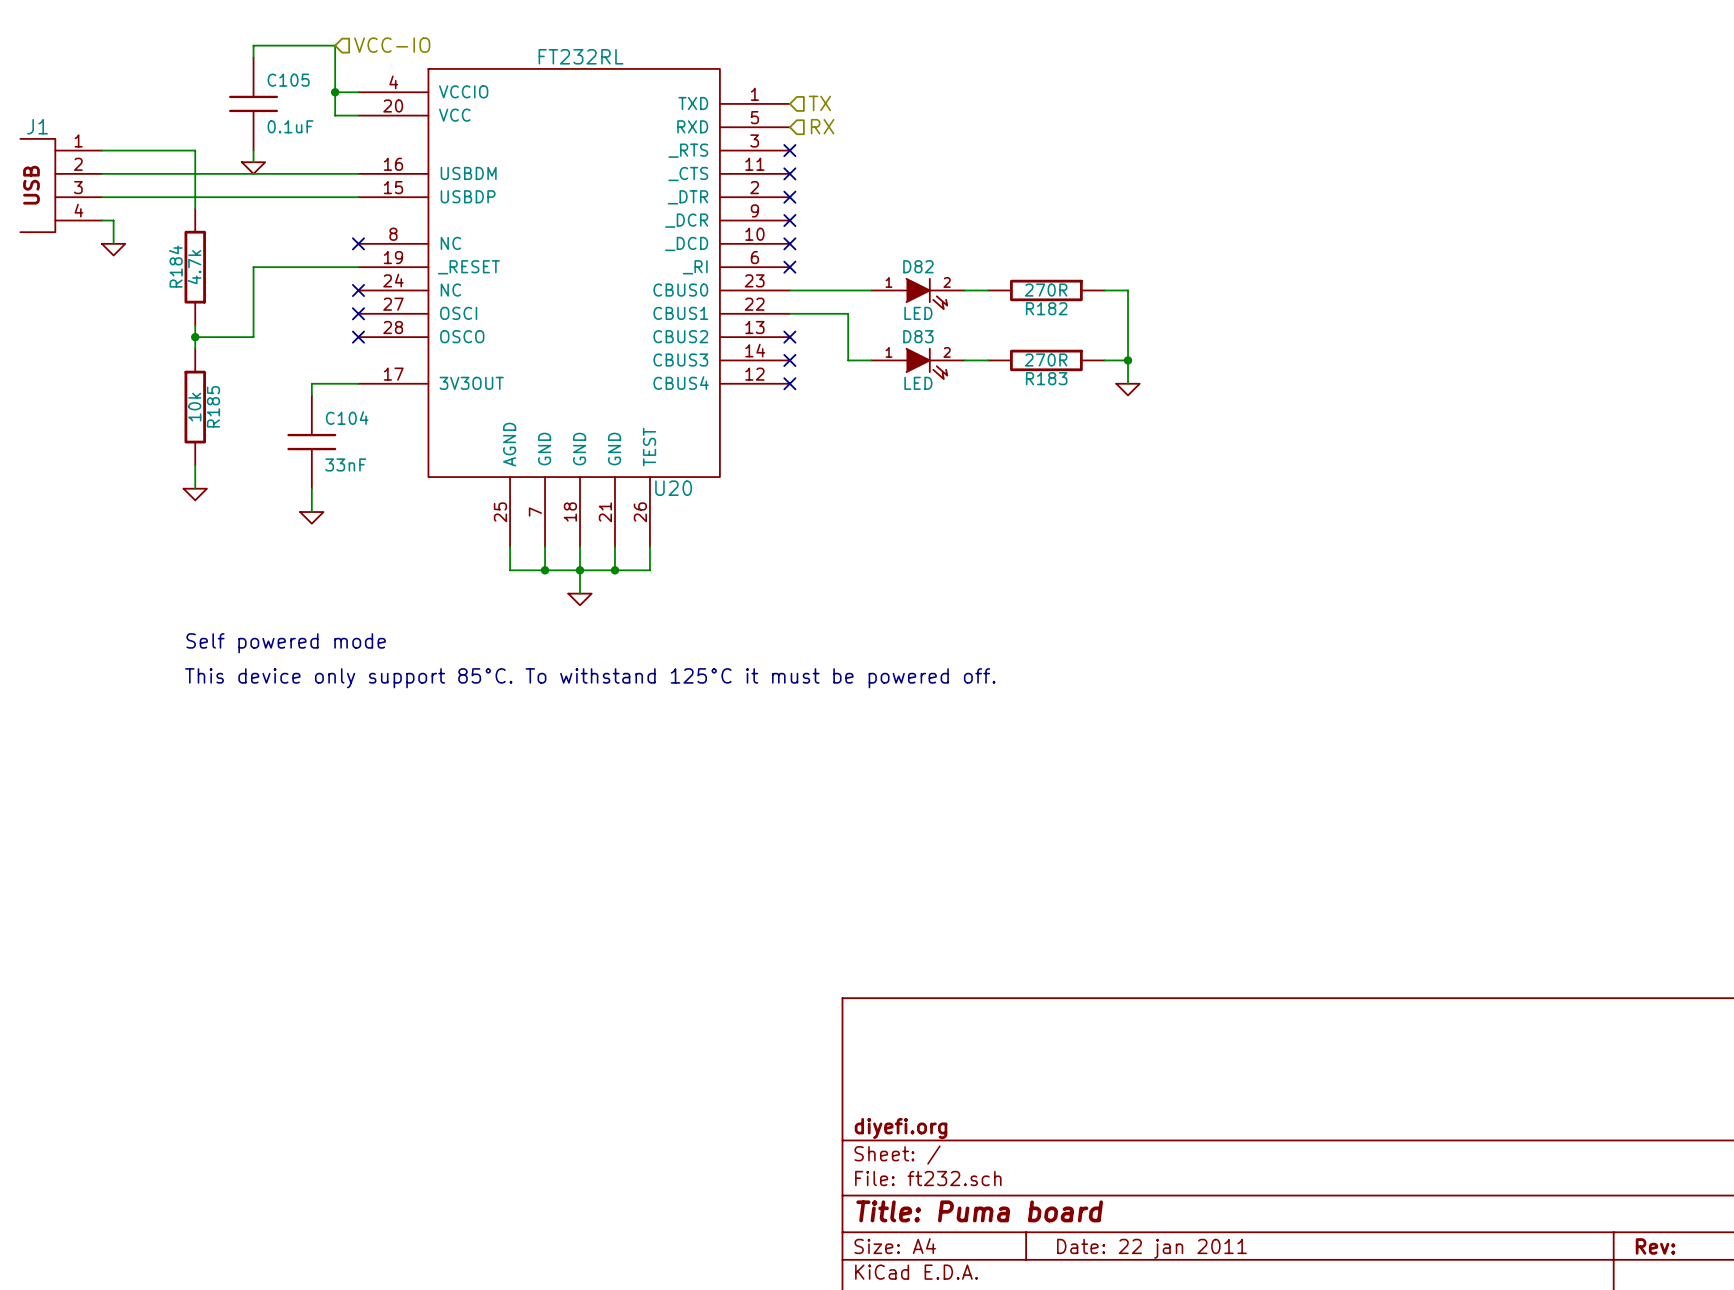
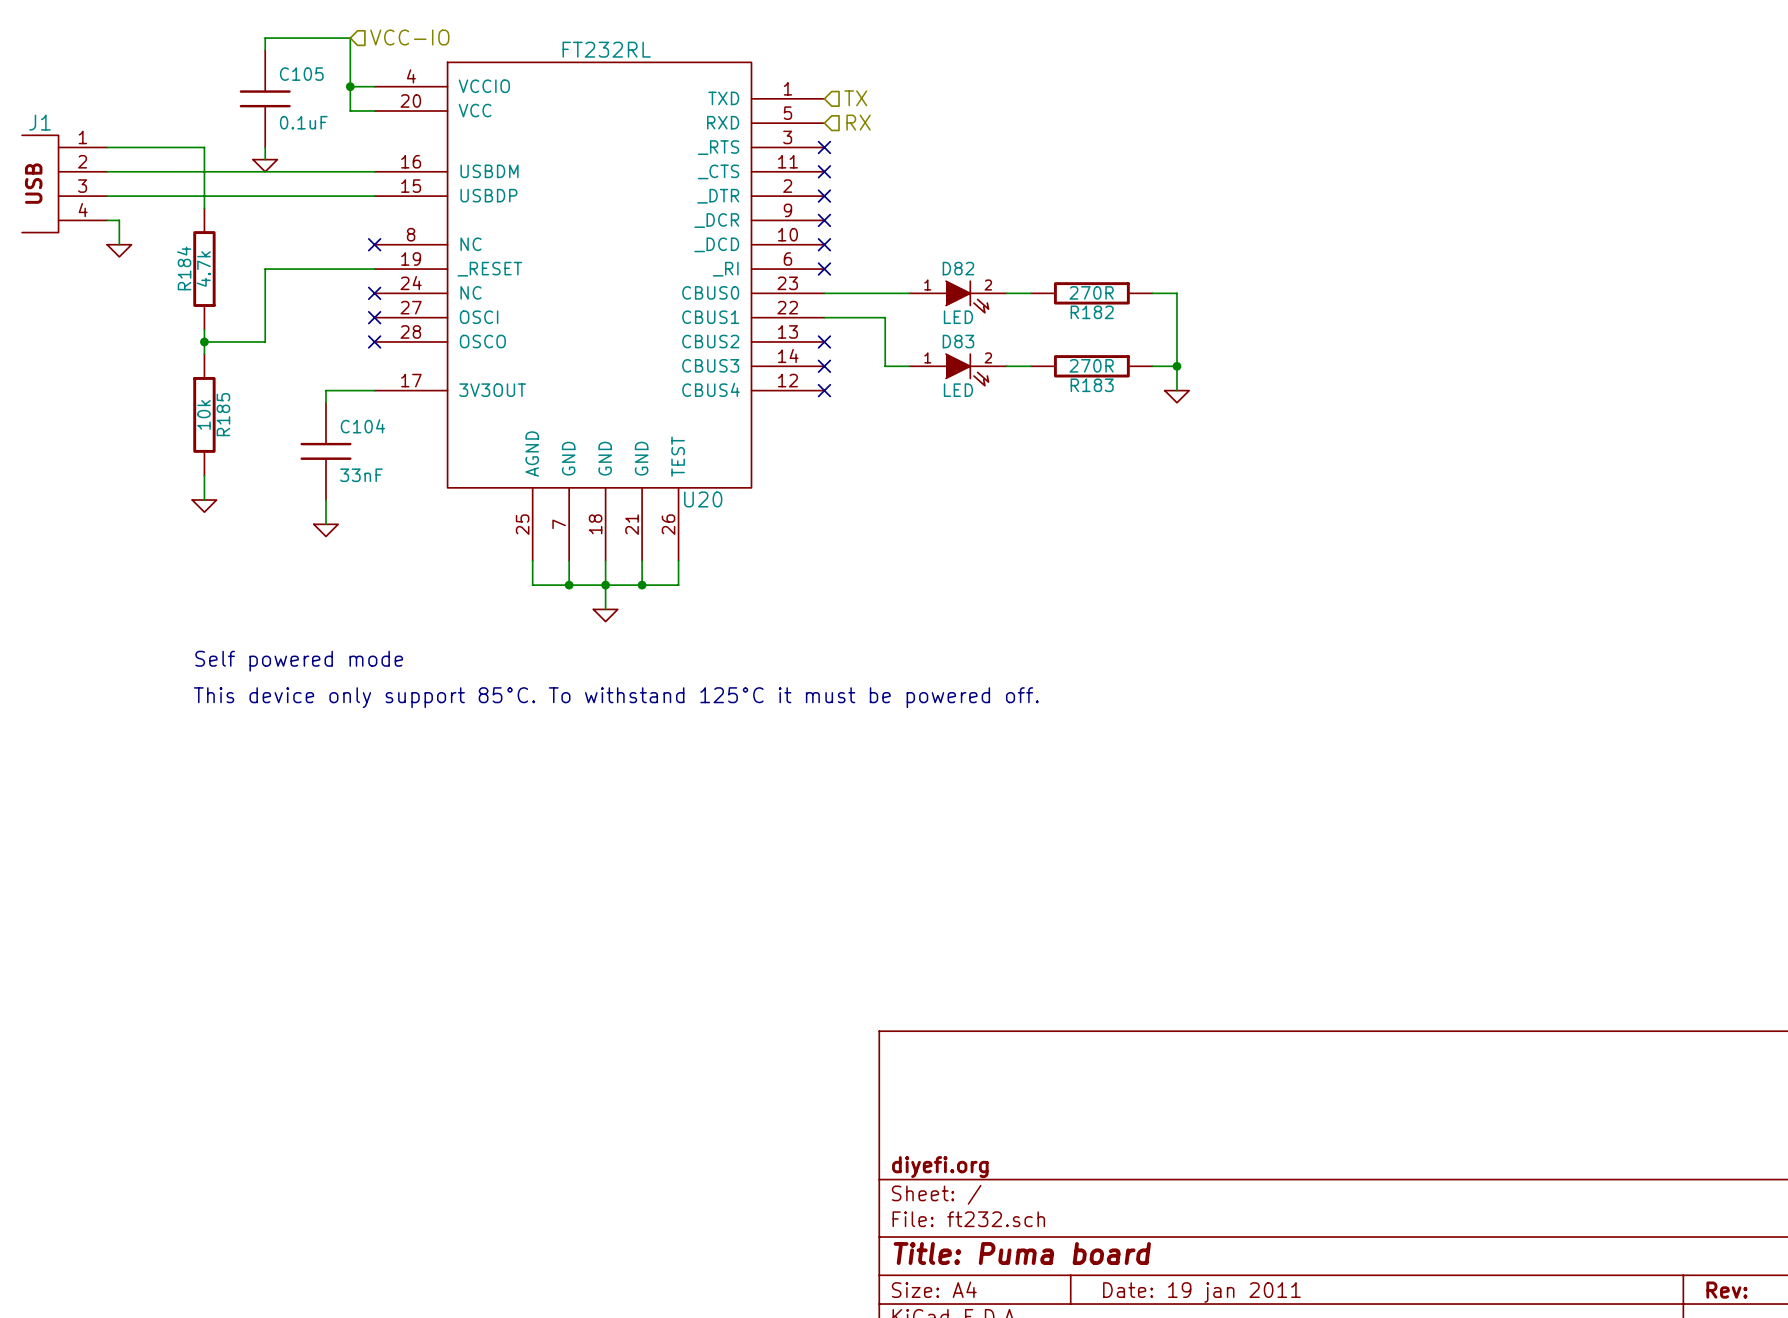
title block: Date: 22 jan 2011 (1151, 1248) -> Date: 19 jan 2011 (1201, 1292)

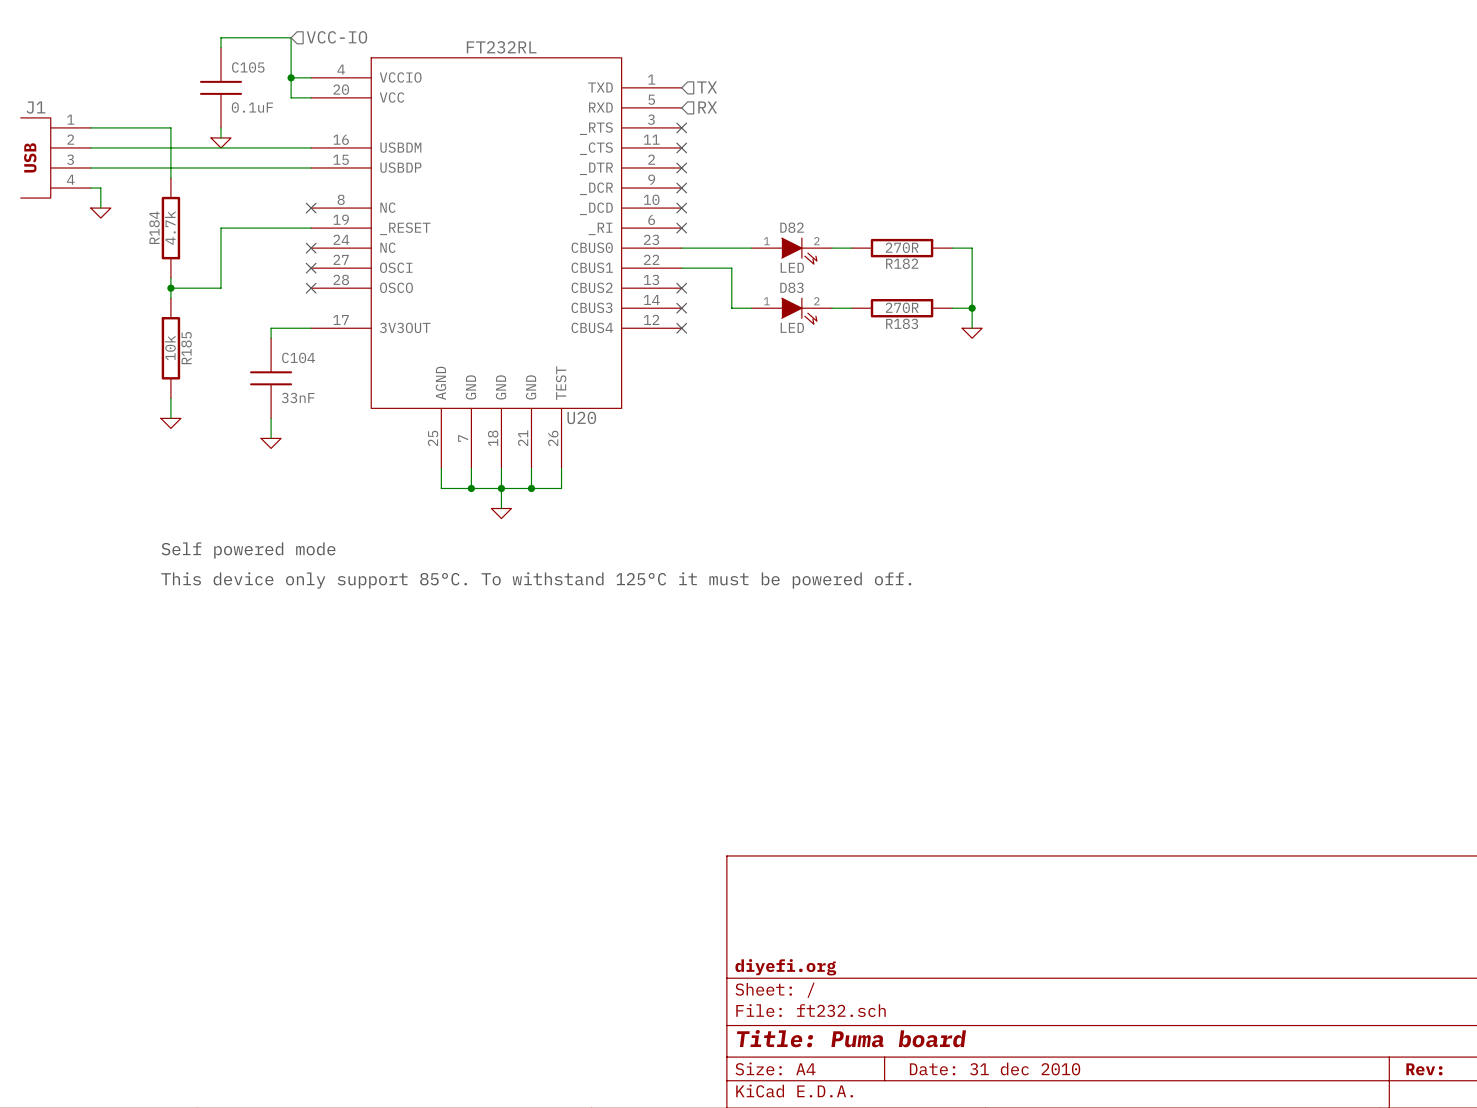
title block: Date: 19 jan 2011 (1201, 1292) -> Date: 31 dec 2010 (995, 1069)

